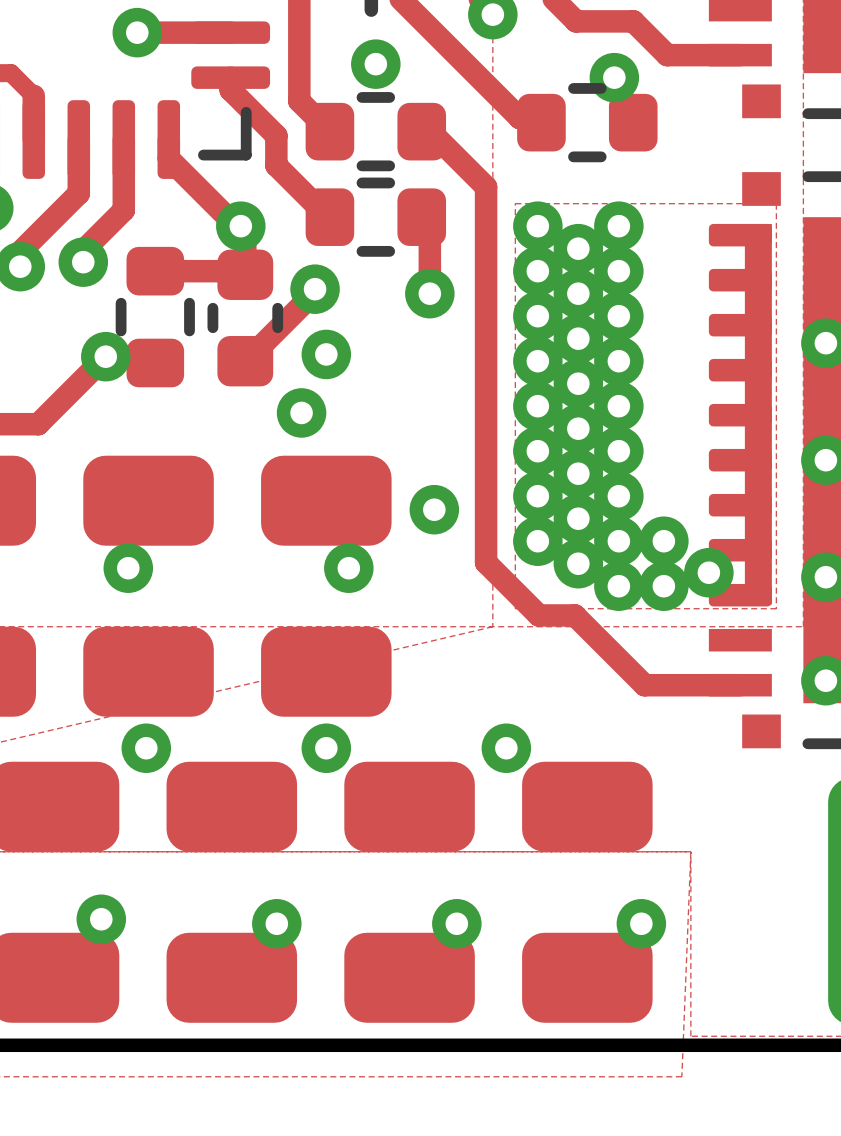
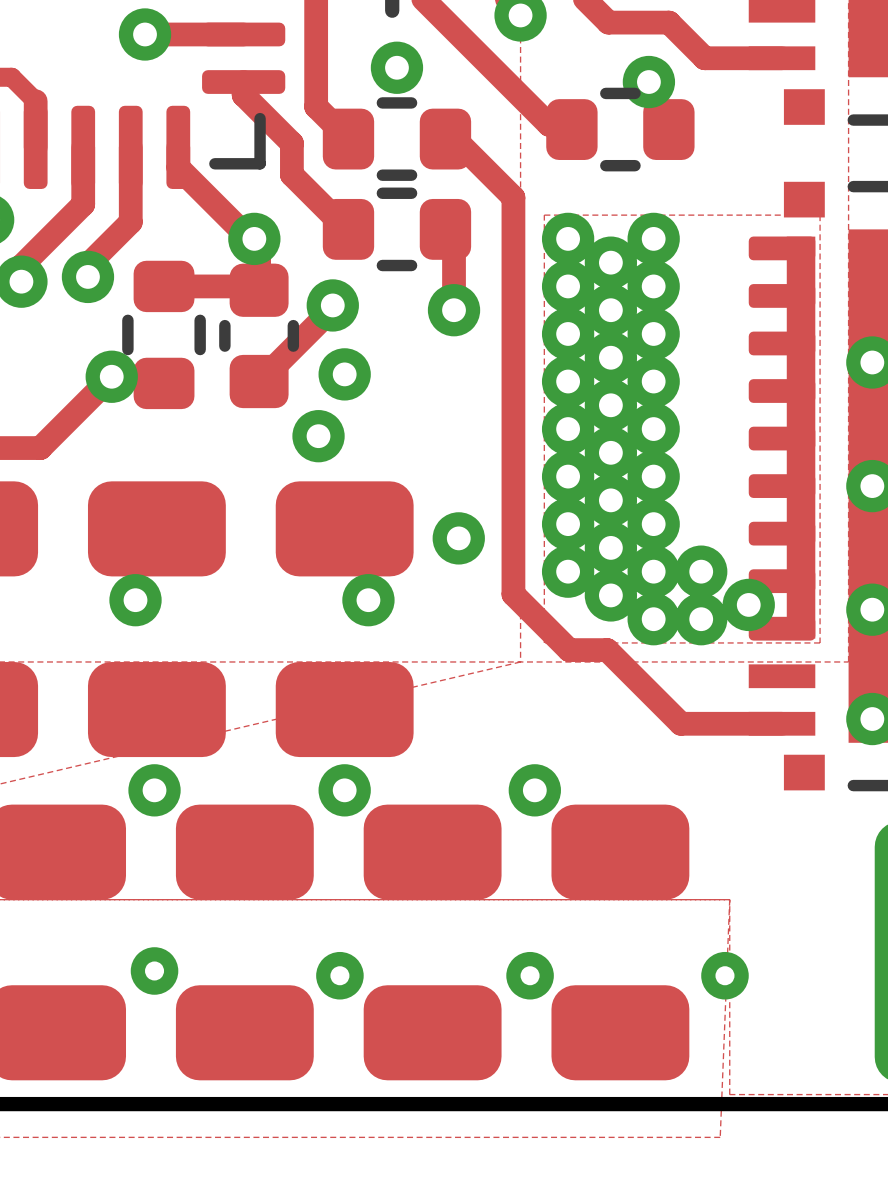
via position: (101, 919) -> (154, 970)
via position: (276, 923) -> (339, 975)
via position: (456, 923) -> (530, 975)
via position: (641, 923) -> (724, 975)

